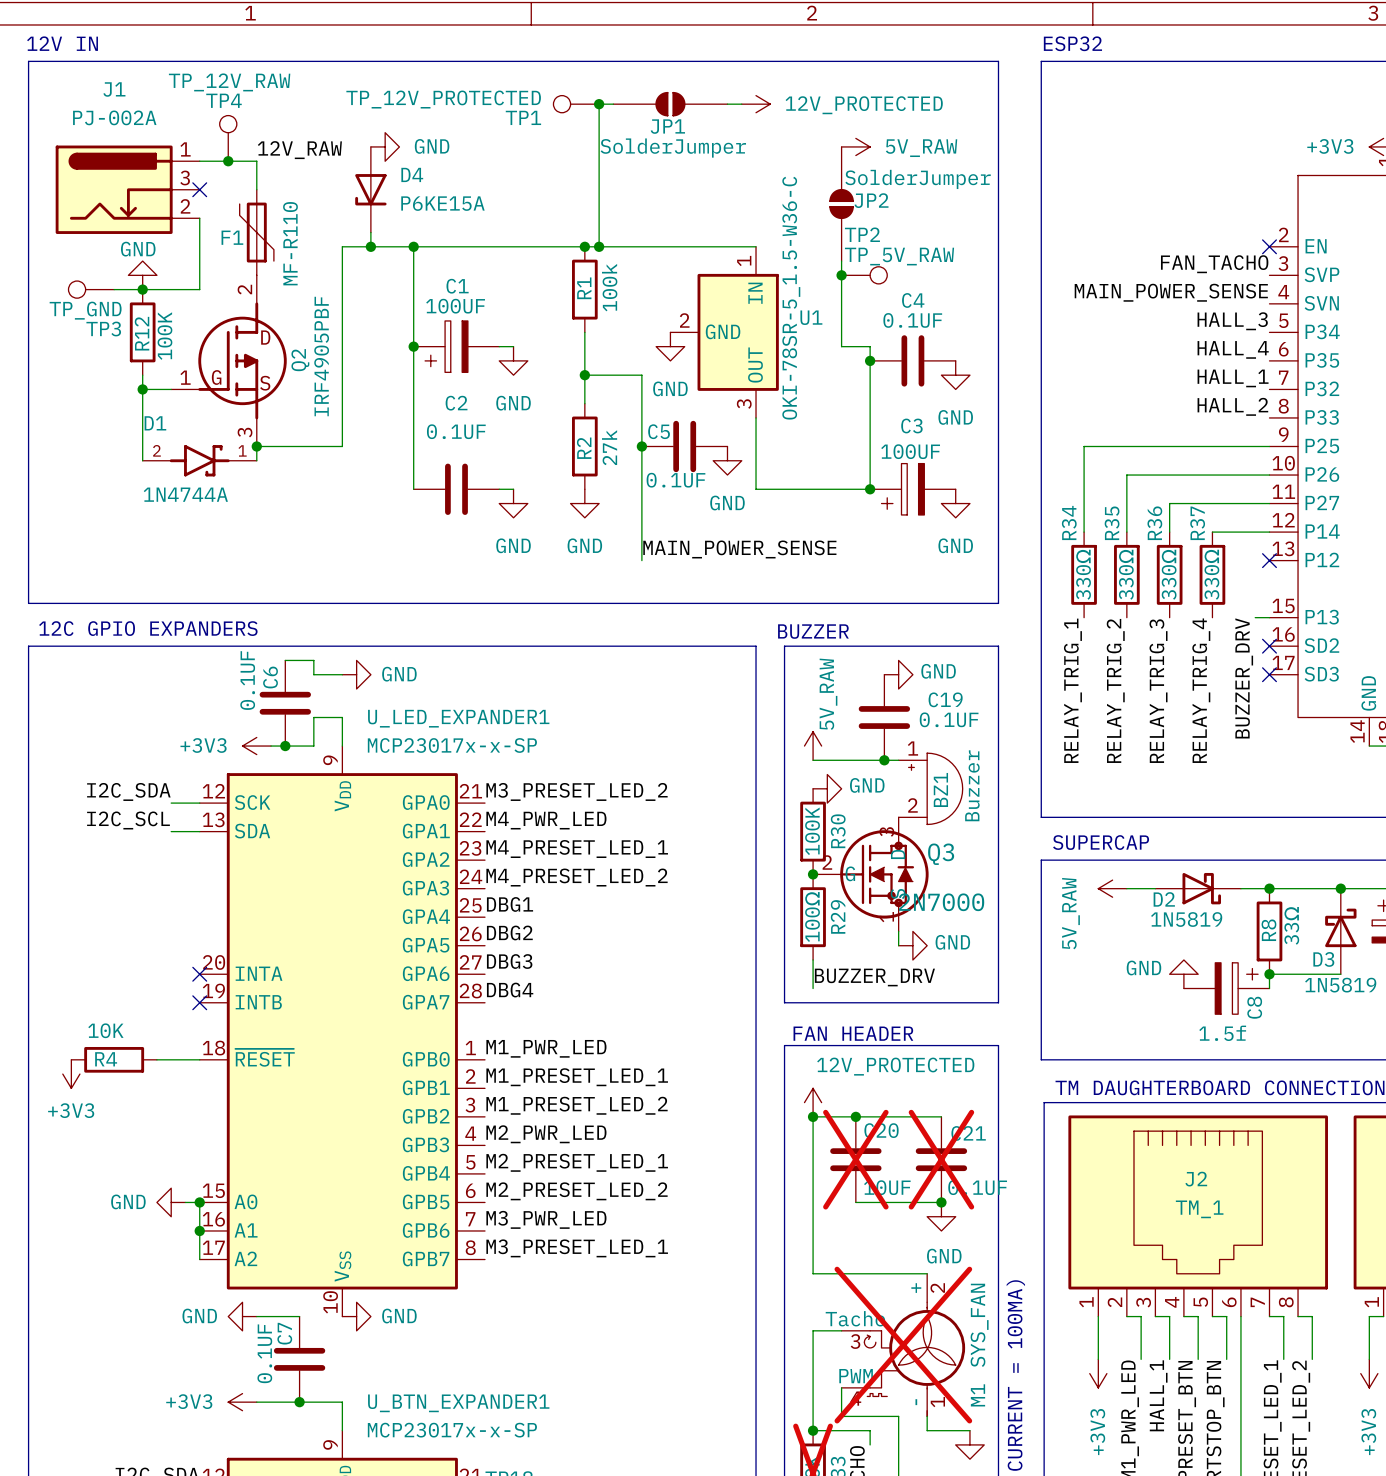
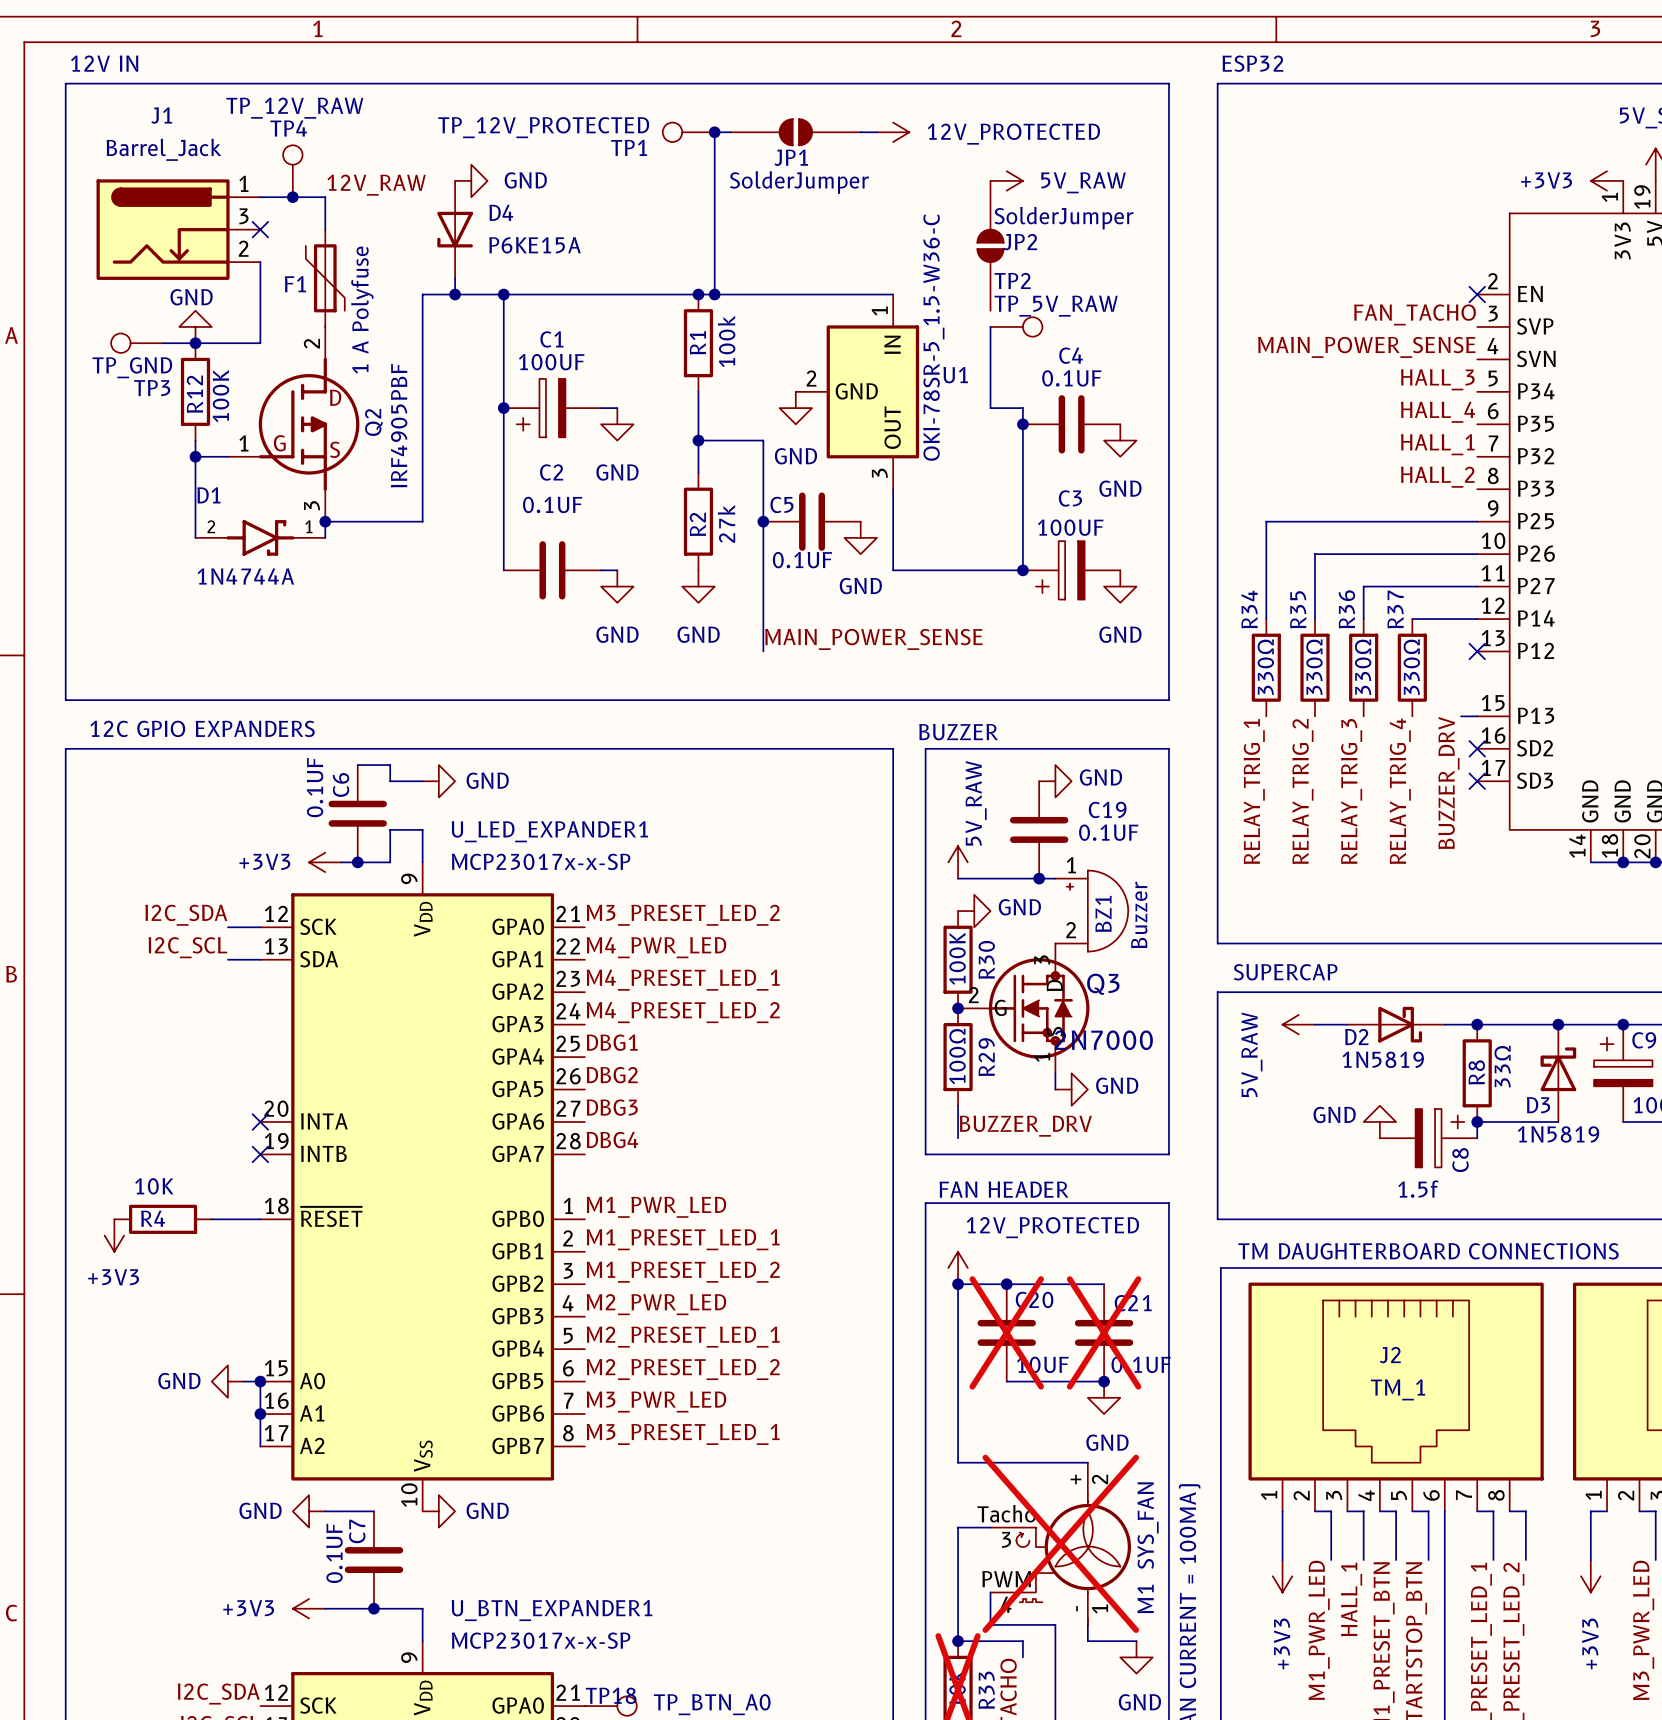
J1 value: PJ-002A (114, 117) -> Barrel_Jack (163, 149)
F1 value: MF-R110 (290, 243) -> 1 A Polyfuse (362, 310)
wire: (841, 261) (841, 275) -> none
junction: (841, 275) -> none

